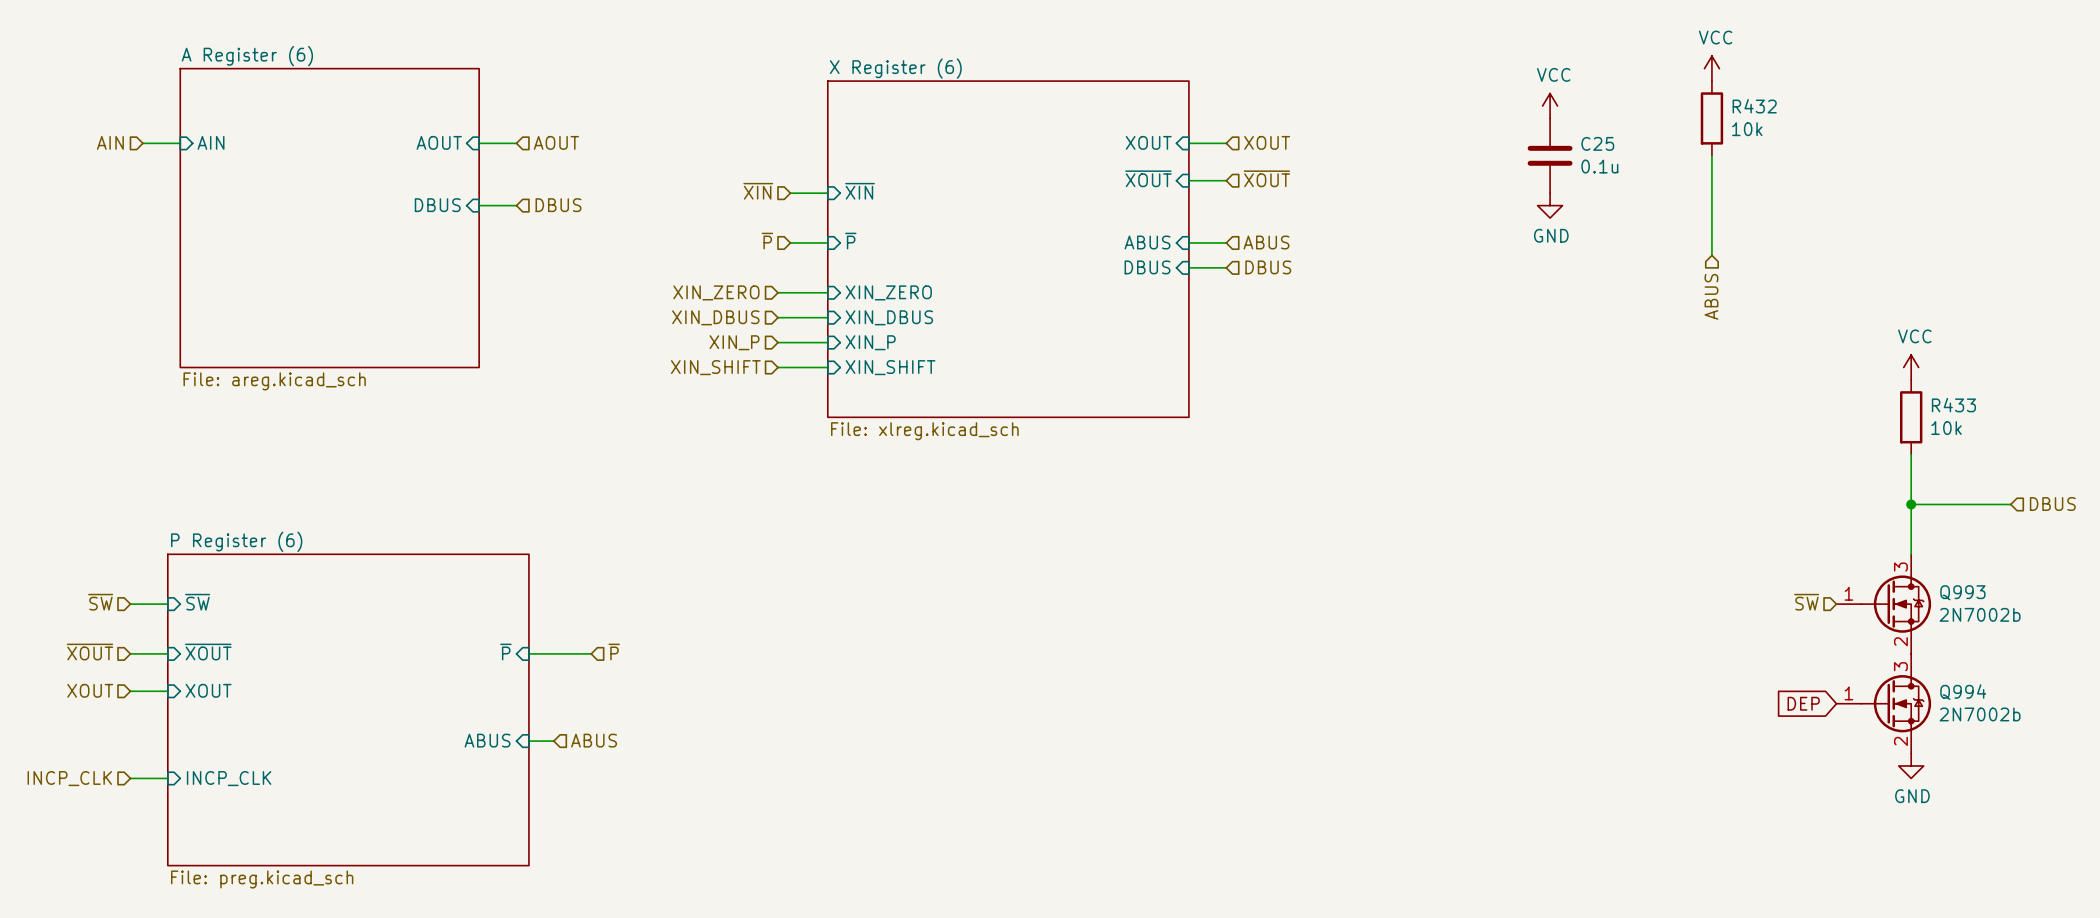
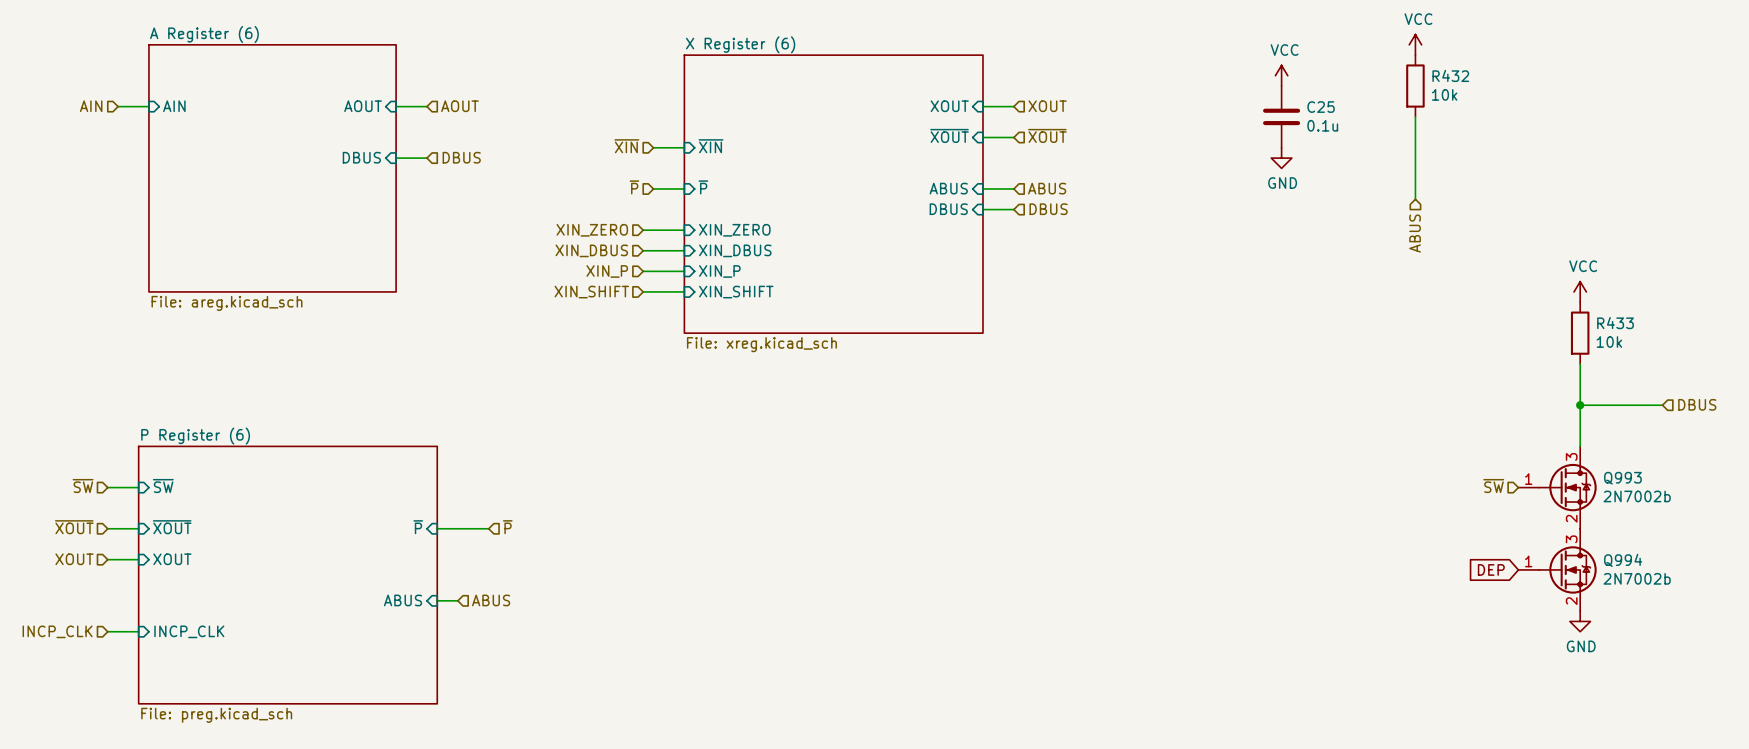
sheet X Register (6) value: File: xlreg.kicad_sch (924, 431) -> File: xreg.kicad_sch (761, 344)

